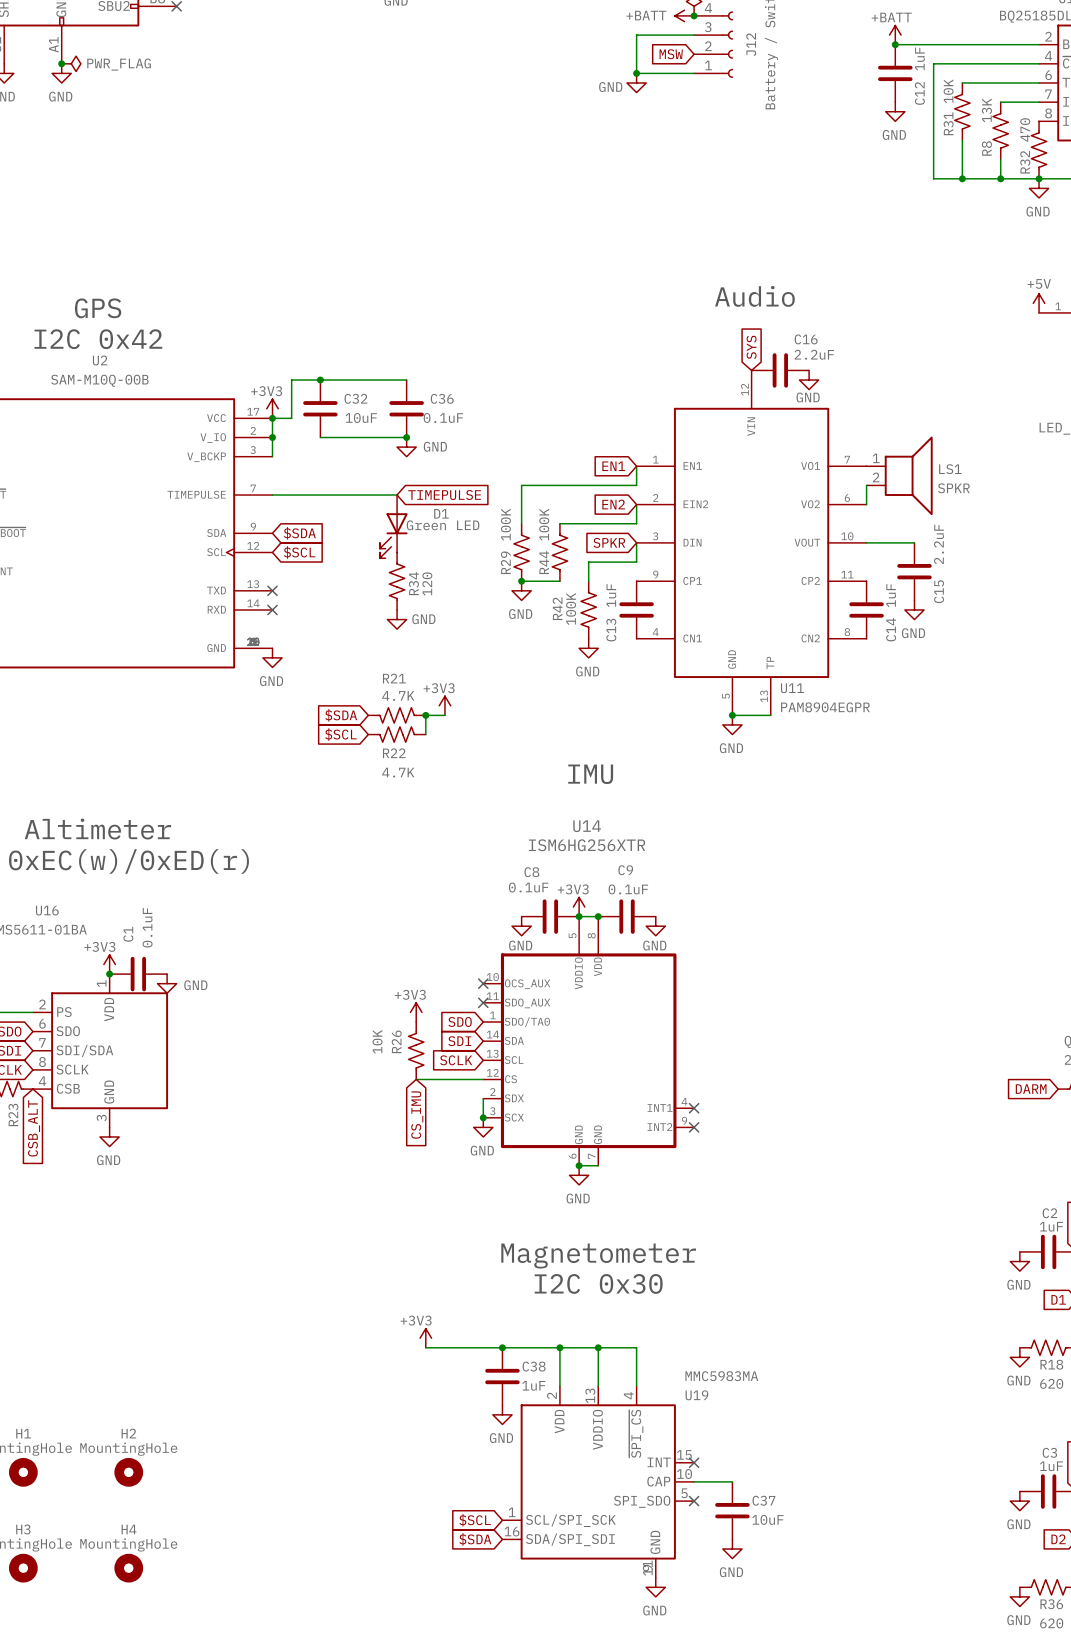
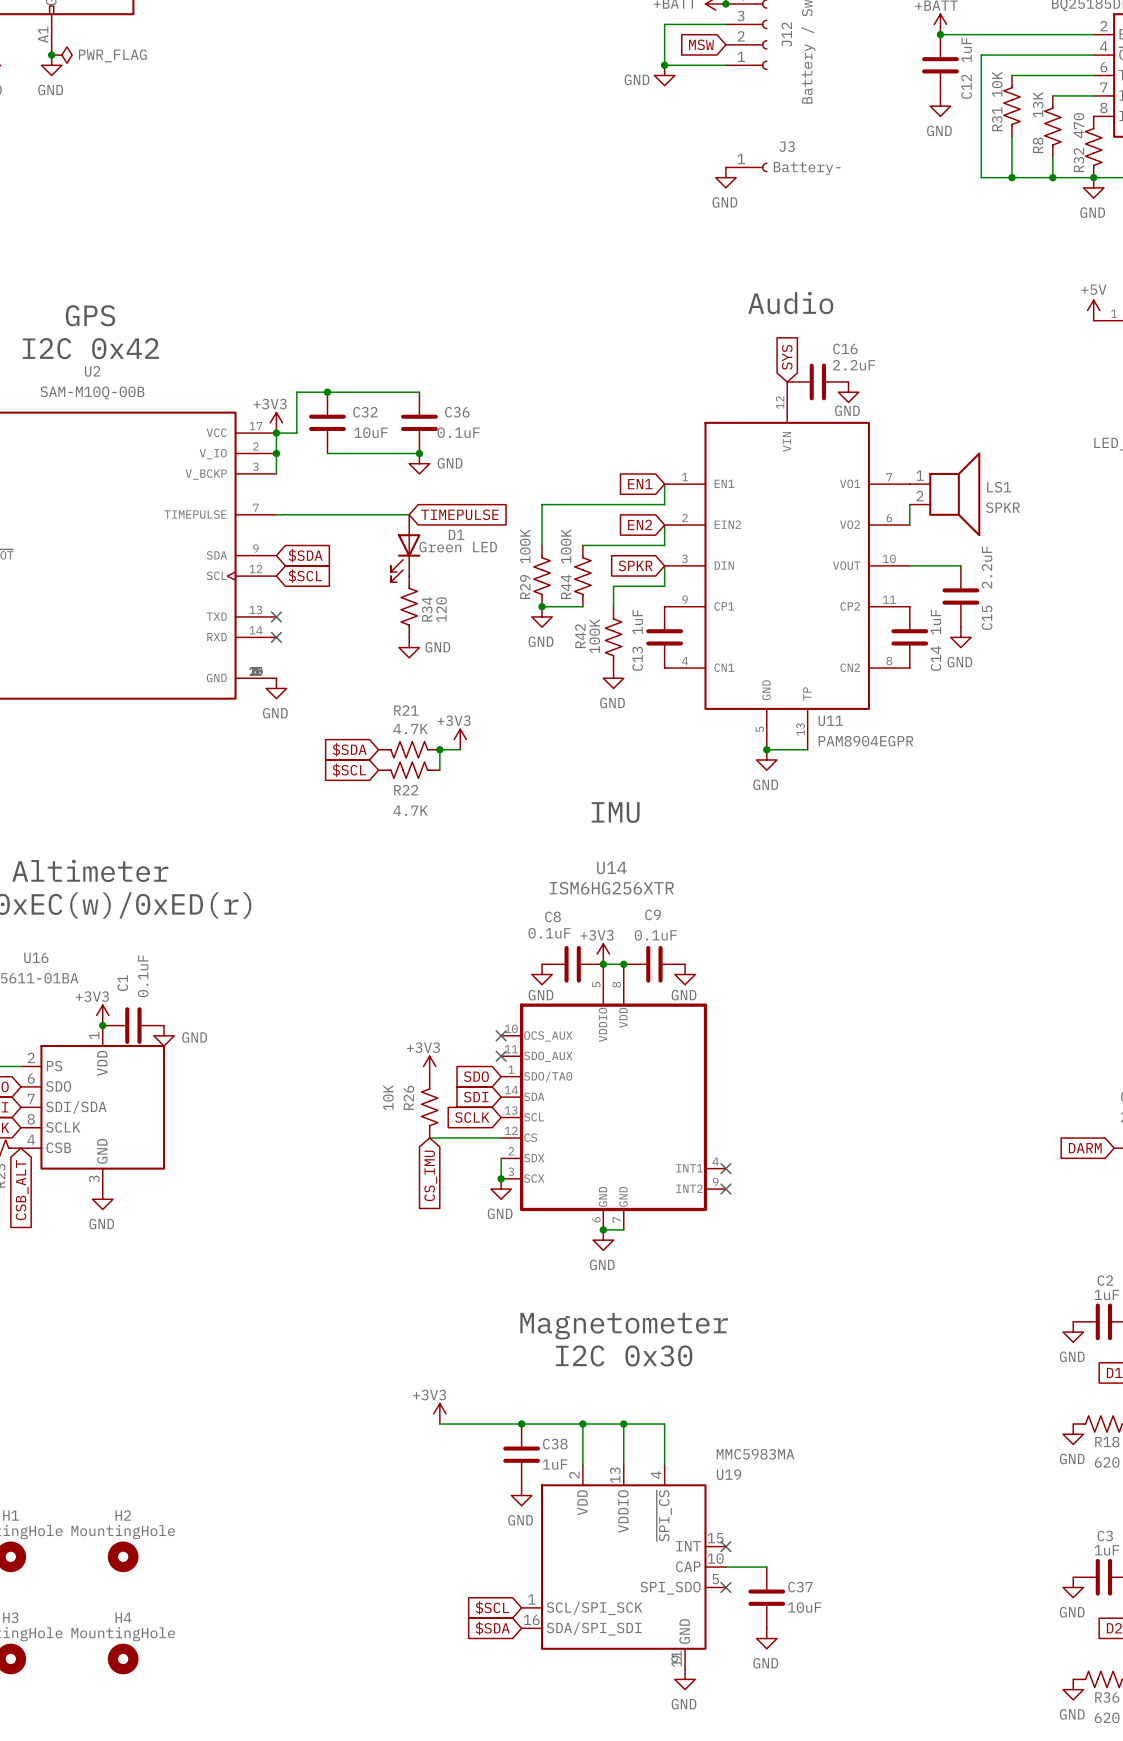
J3: none -> Battery- (746, 167)
power symbol: none -> GND (725, 177)

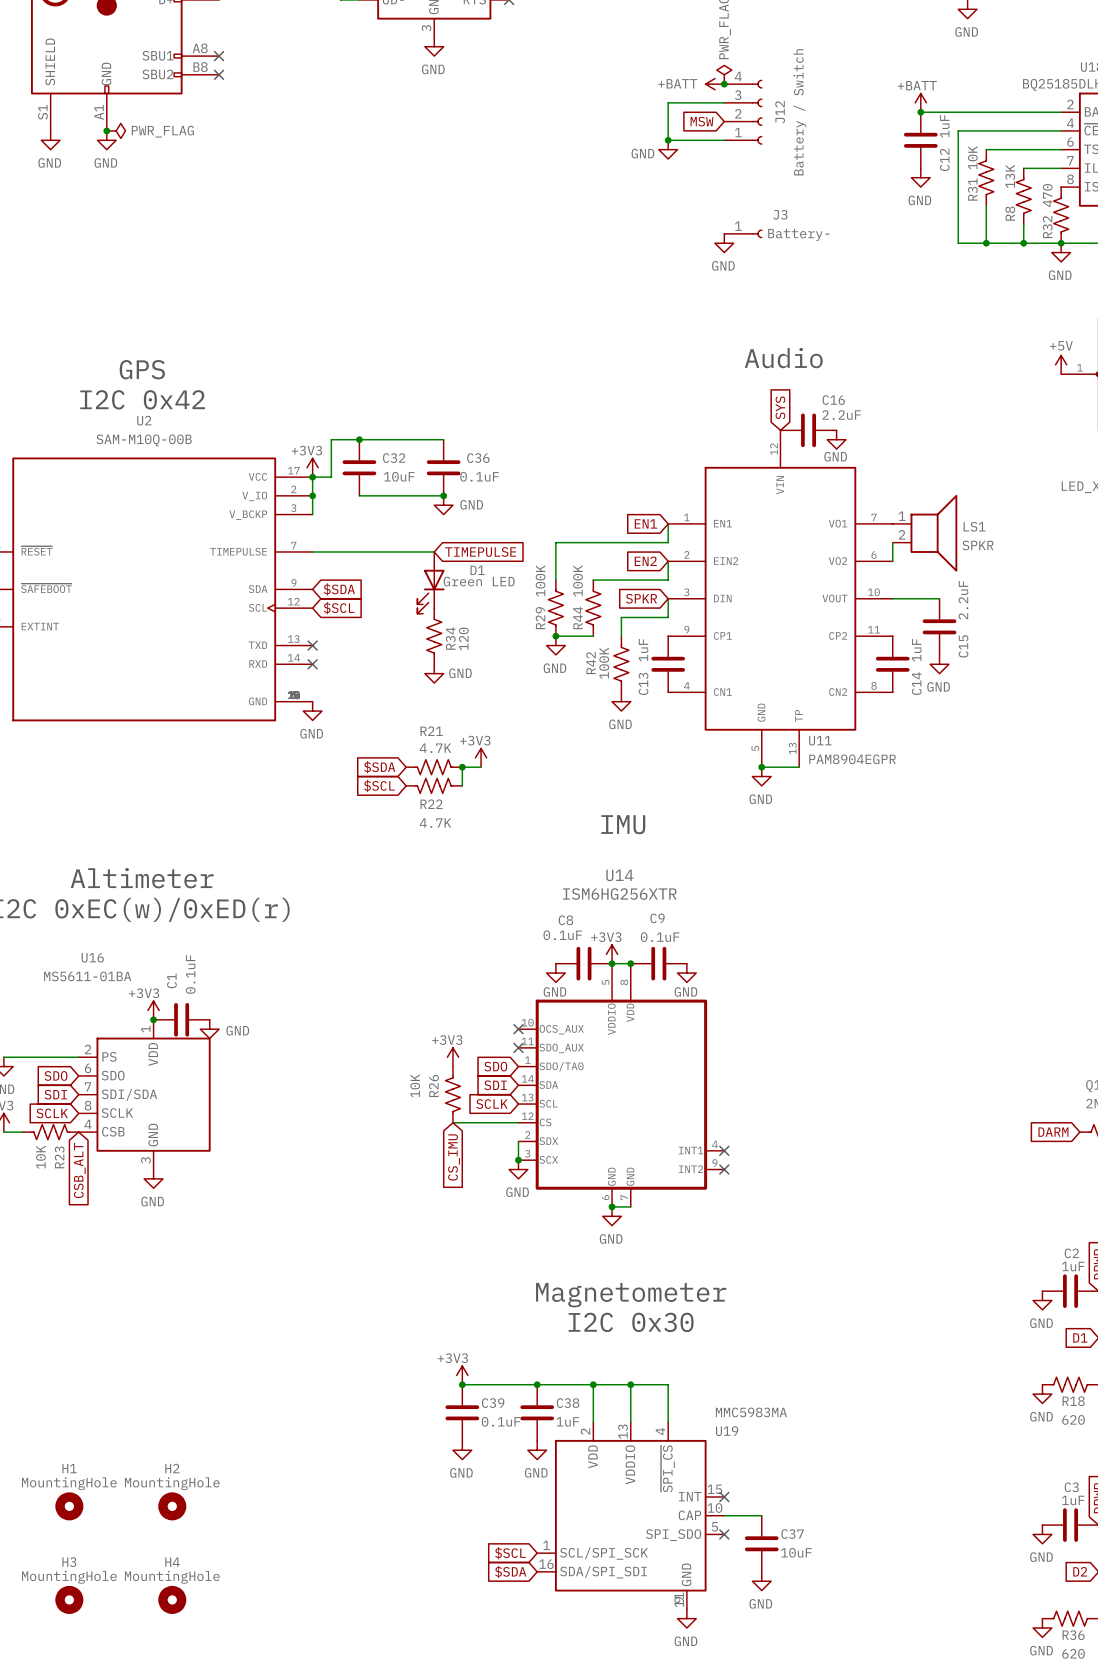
junction: none -> (462, 1384)
C39: none -> 0.1uF (462, 1412)
power symbol: none -> GND (462, 1450)

